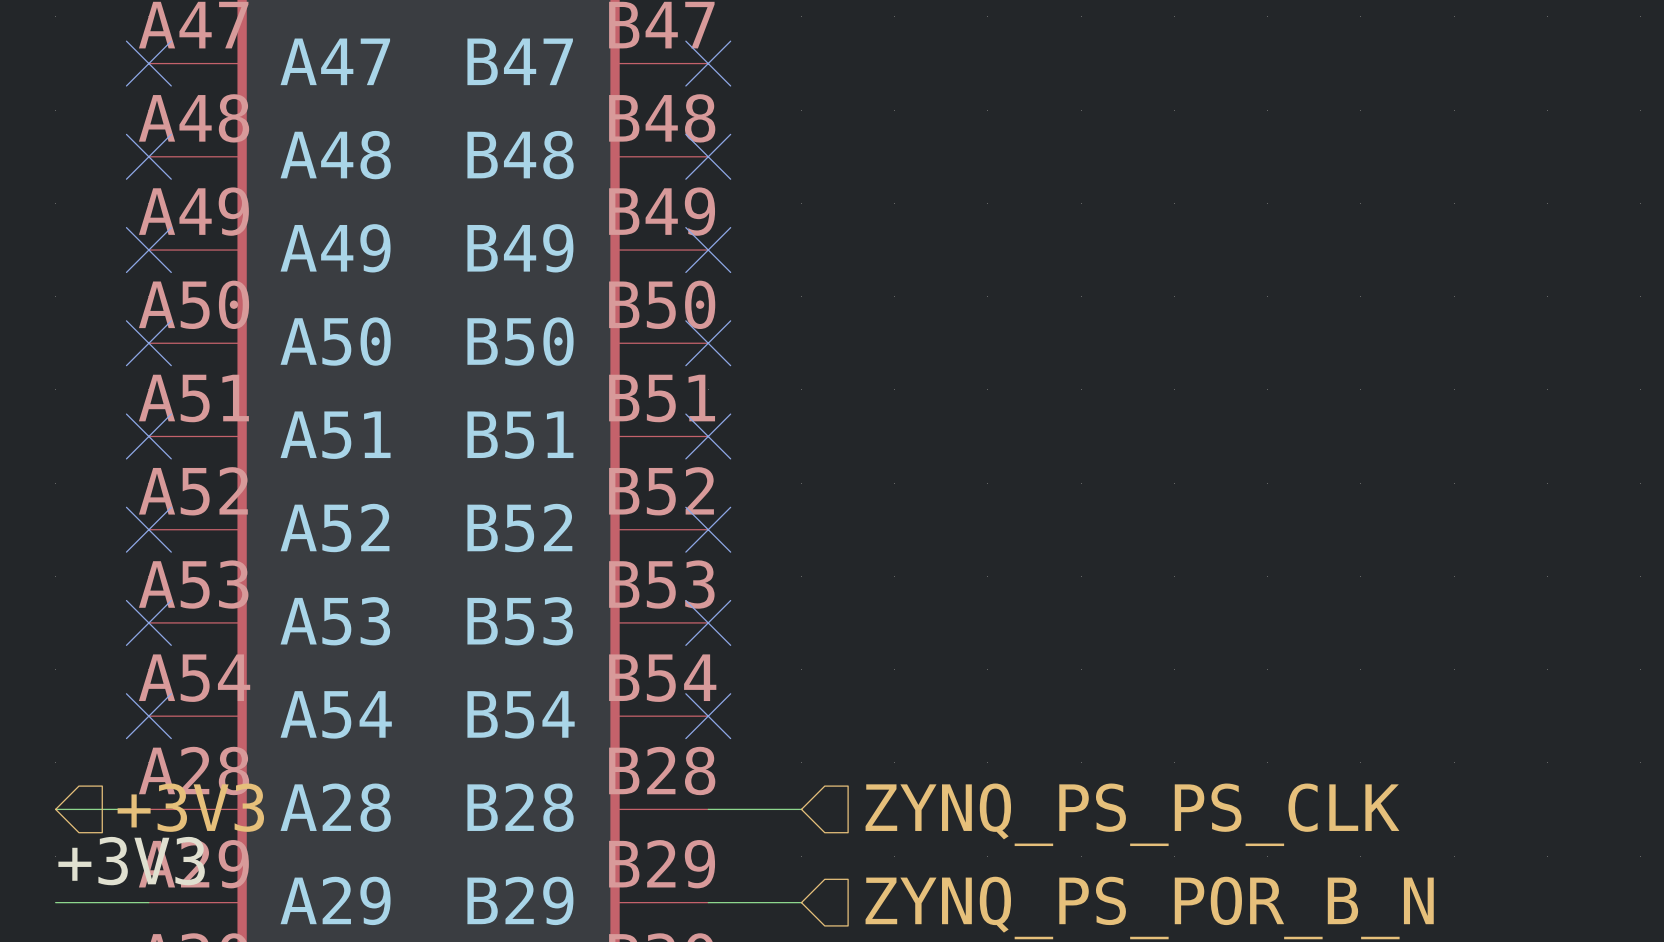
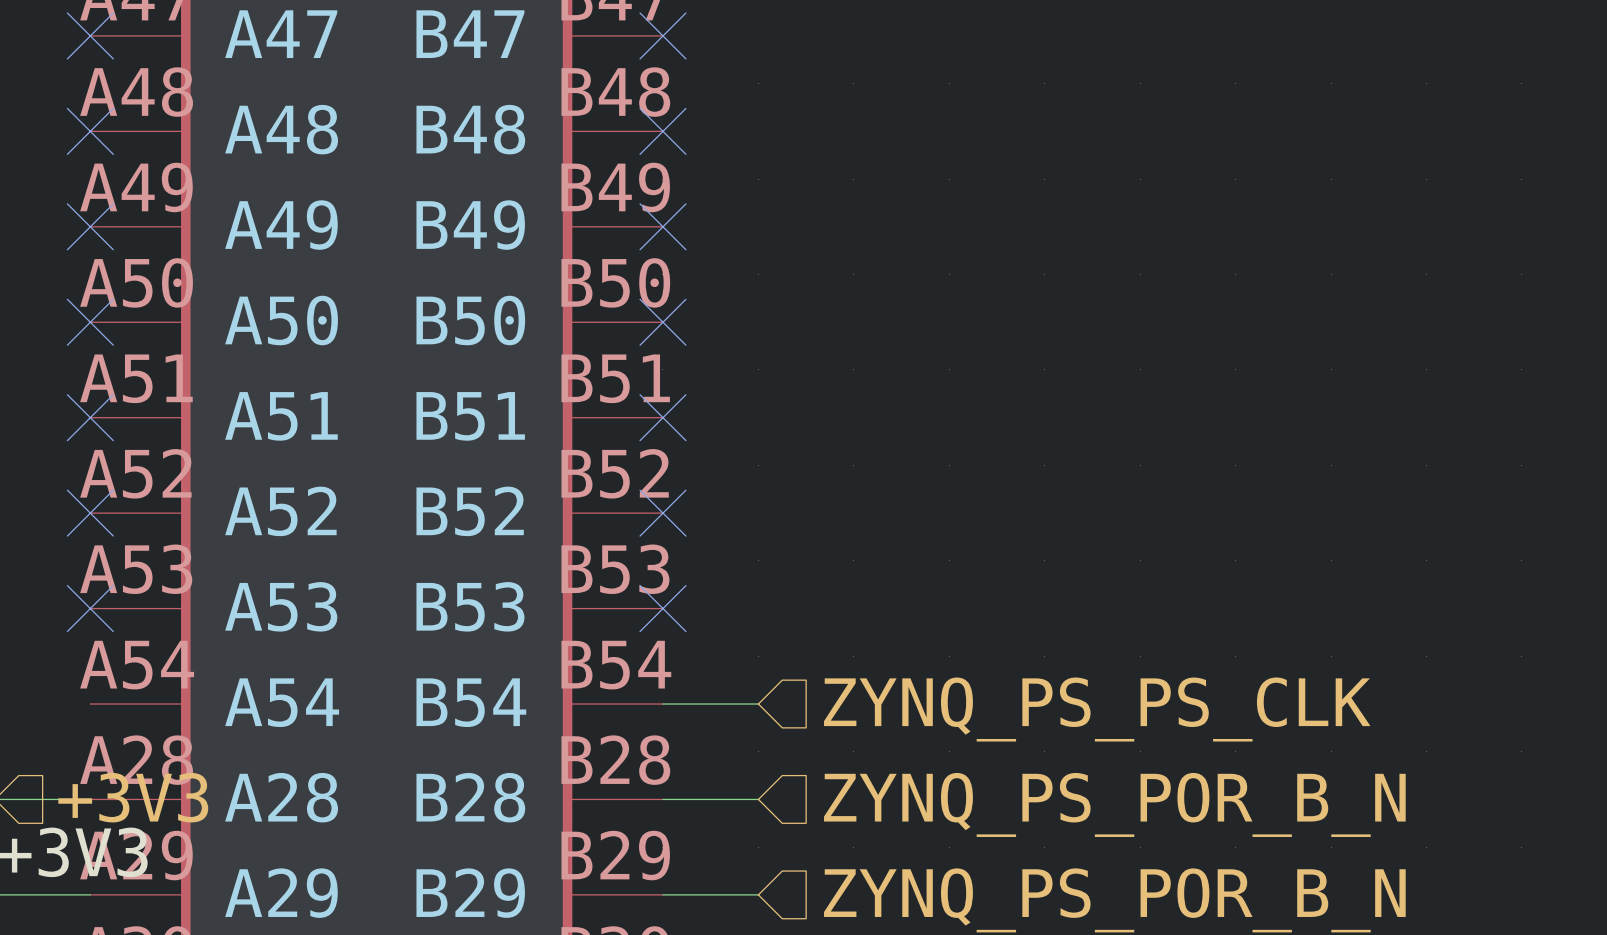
no-connect mark: (148, 716) -> none
wire: none -> (662, 704) (758, 704)
no-connect mark: (708, 716) -> none
hierarchical label: none -> ZYNQ_PS_PS_CLK (1097, 709)
hierarchical label: ZYNQ_PS_PS_CLK (1132, 814) -> ZYNQ_PS_POR_B_N (1114, 804)

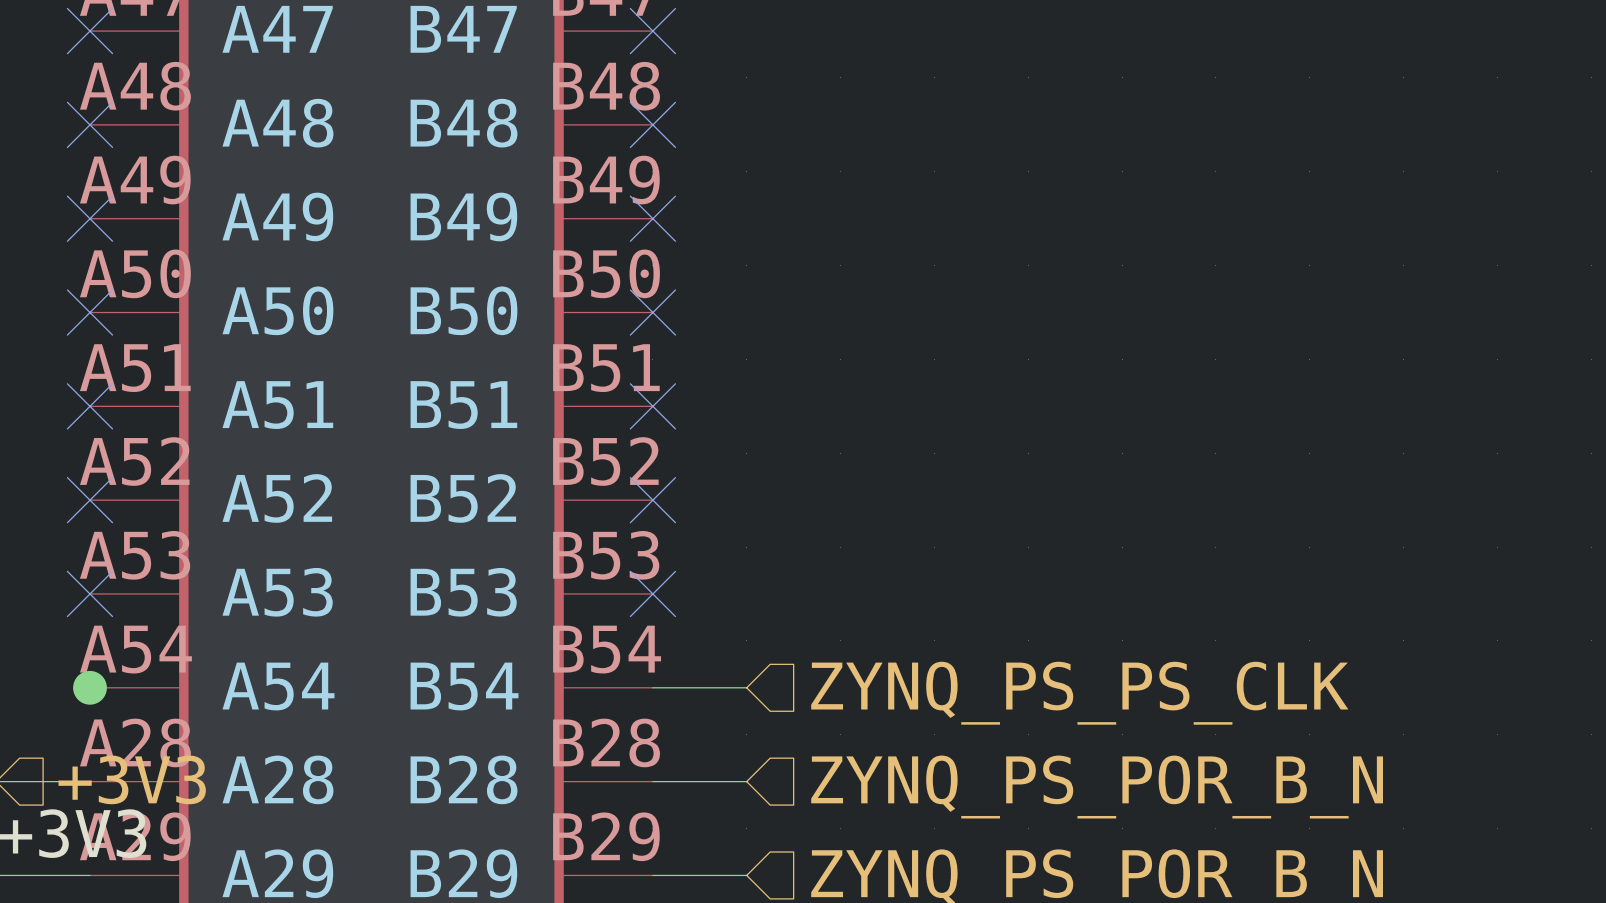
junction: none -> (90, 687)

